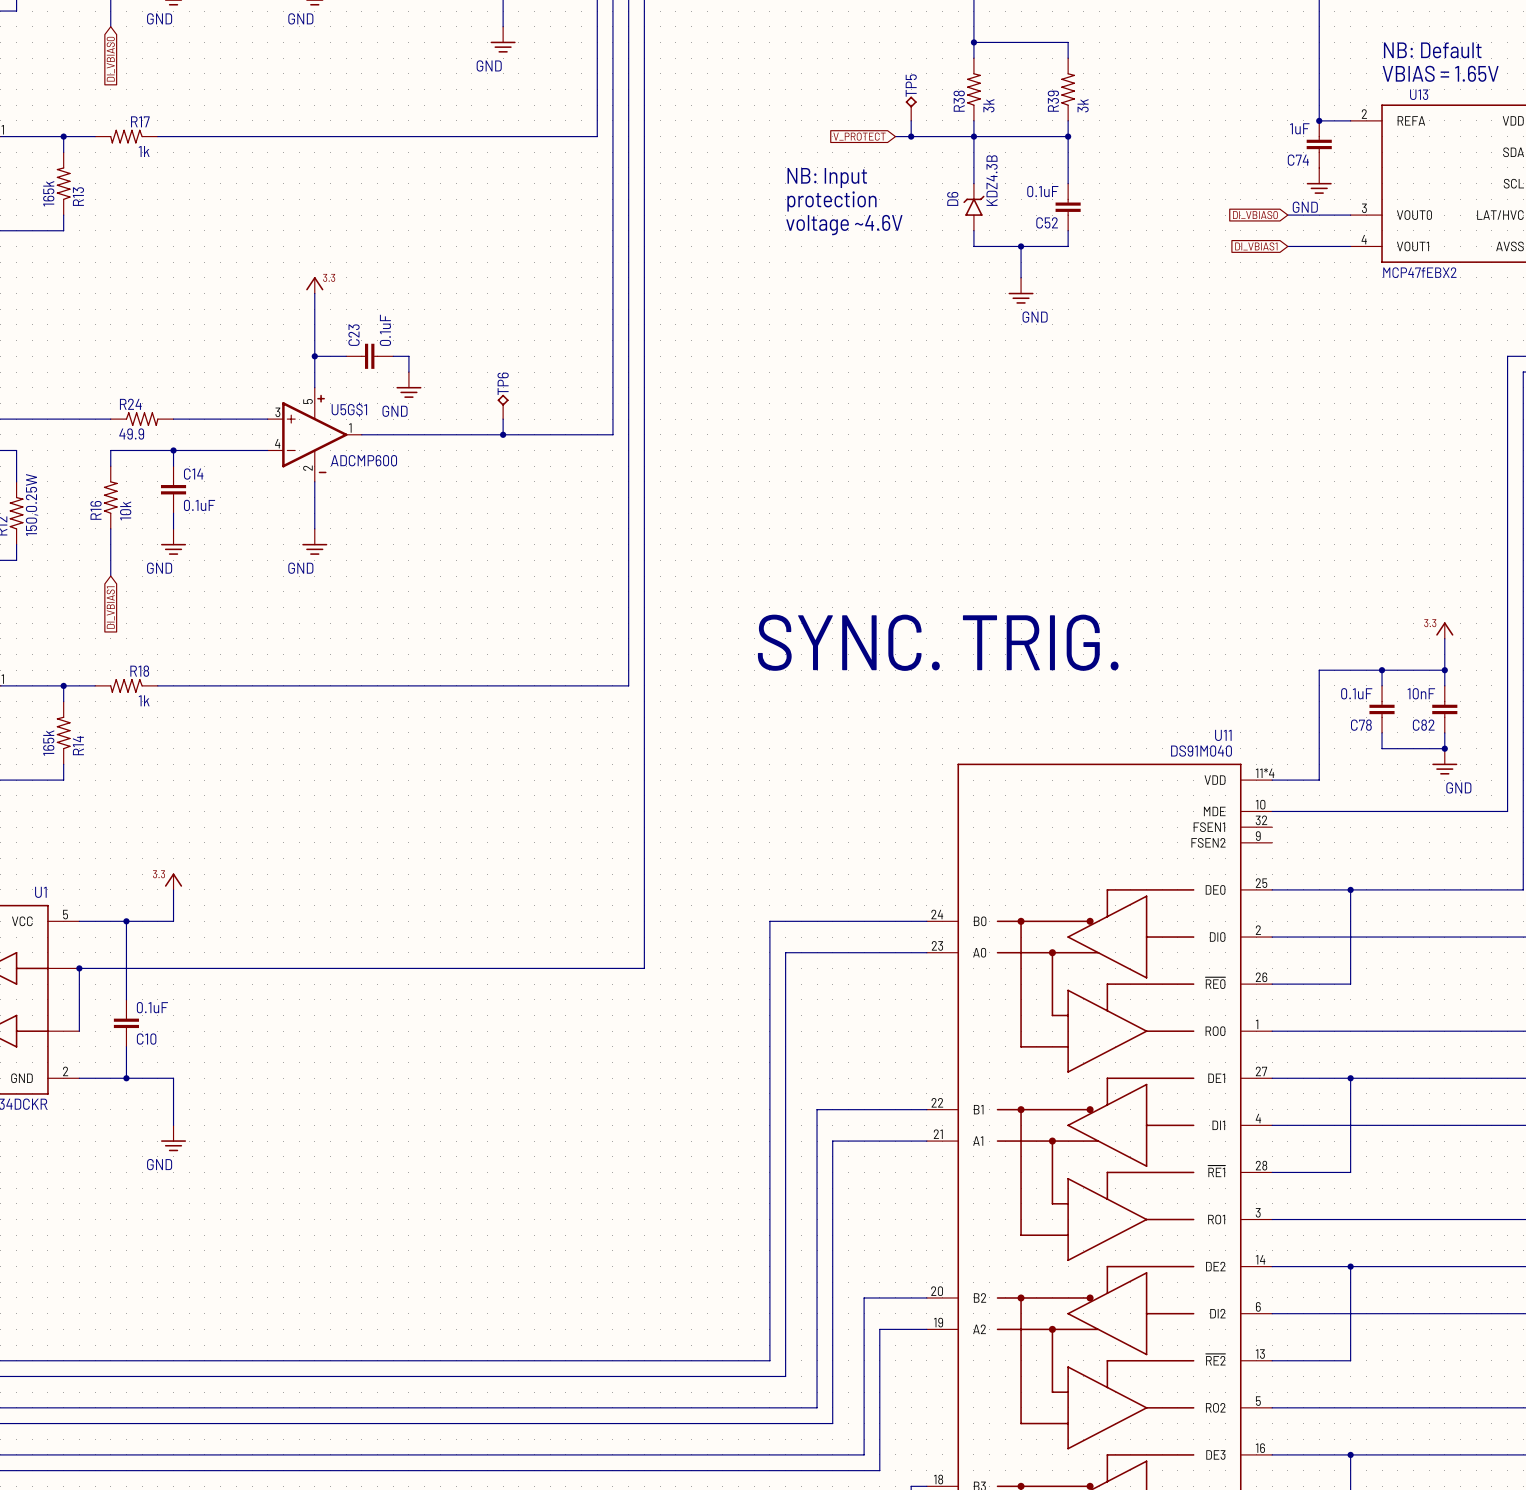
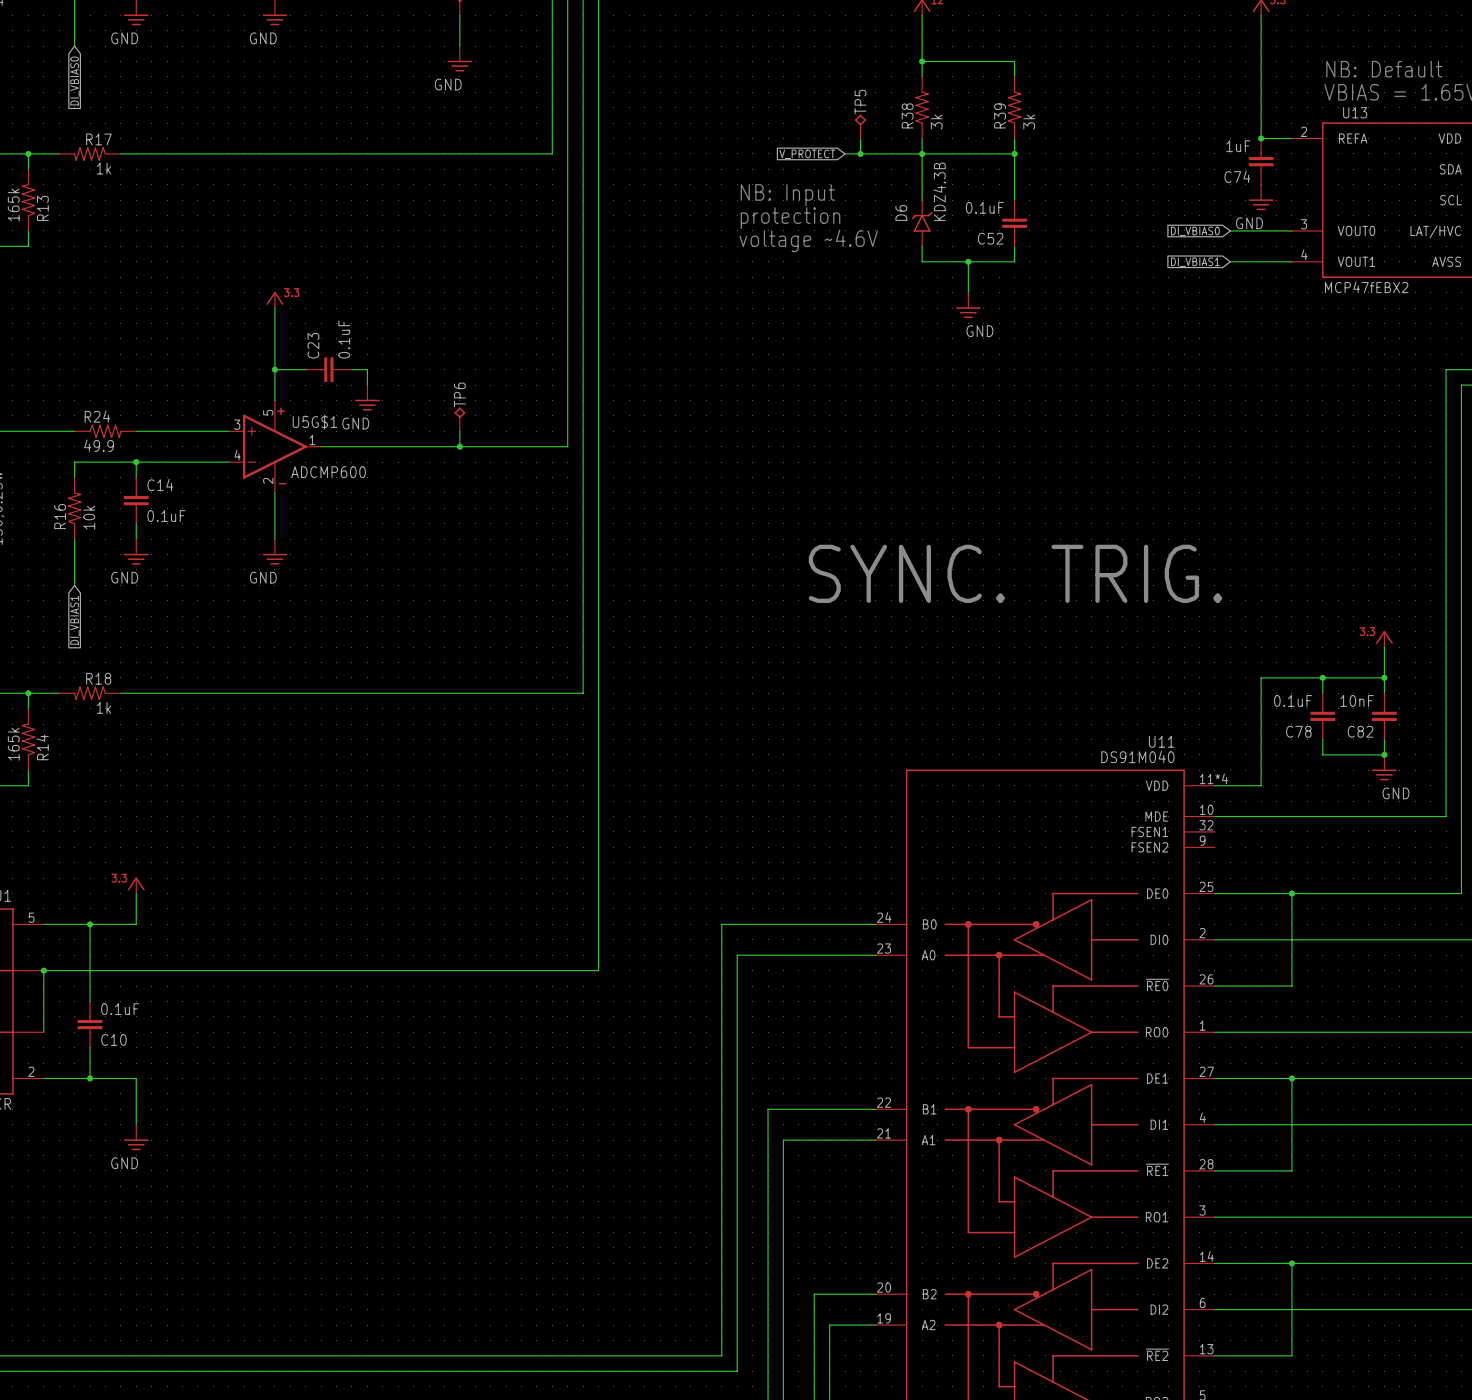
text position: SYNC. TRIG. (938, 642) -> SYNC. TRIG. (1015, 573)

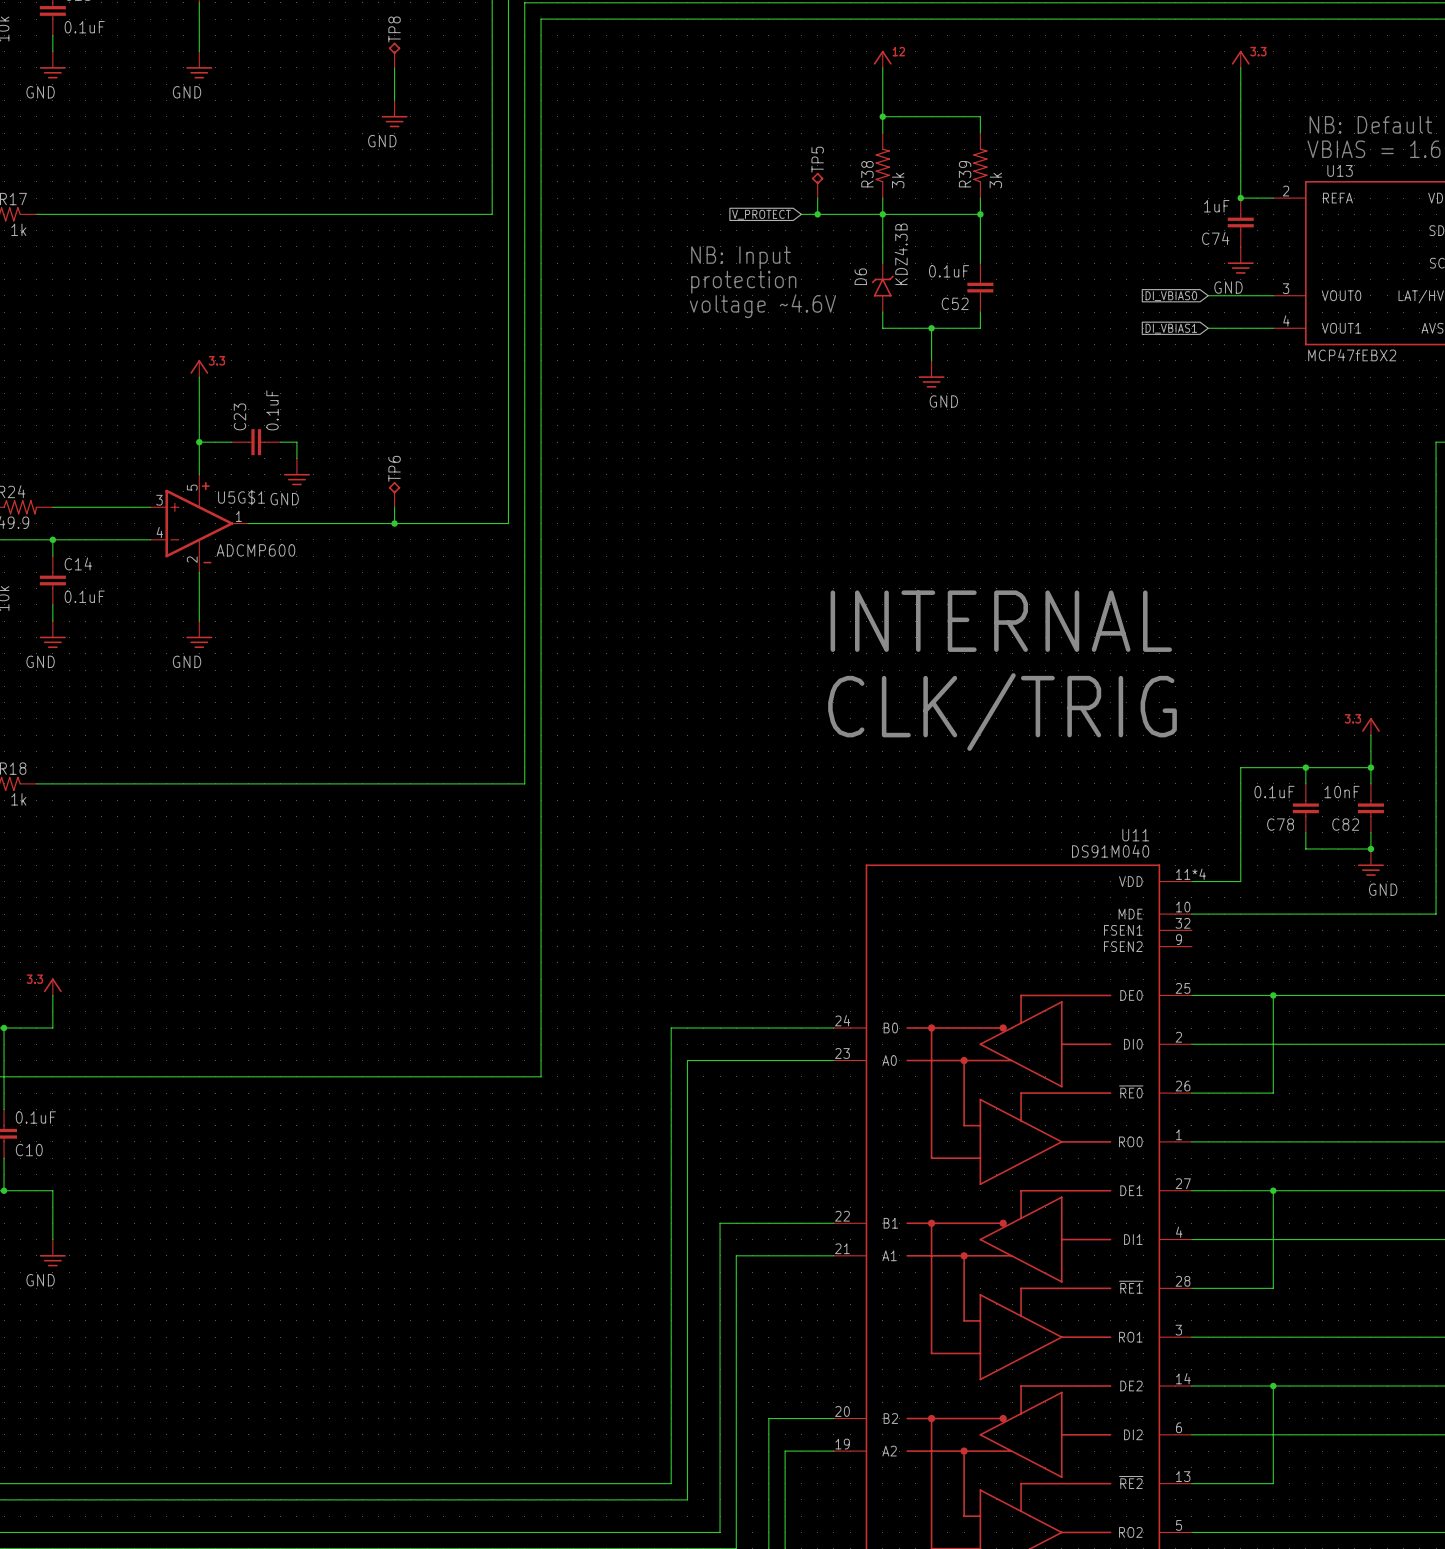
text: none -> INTERNAL (1001, 621)
text: SYNC. TRIG. (1015, 573) -> none
text: none -> CLK/TRIG (1002, 712)

